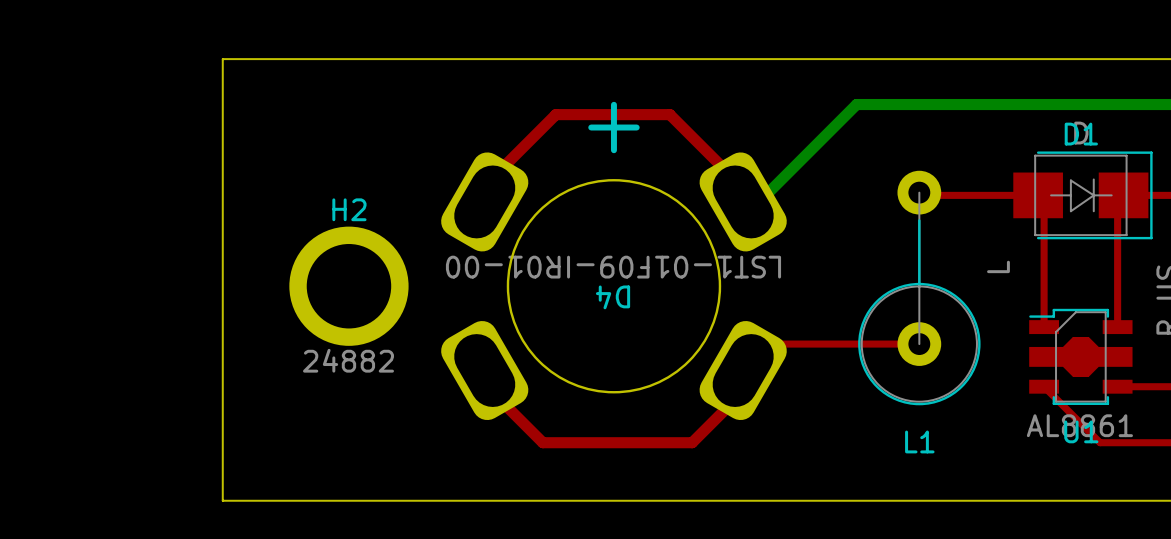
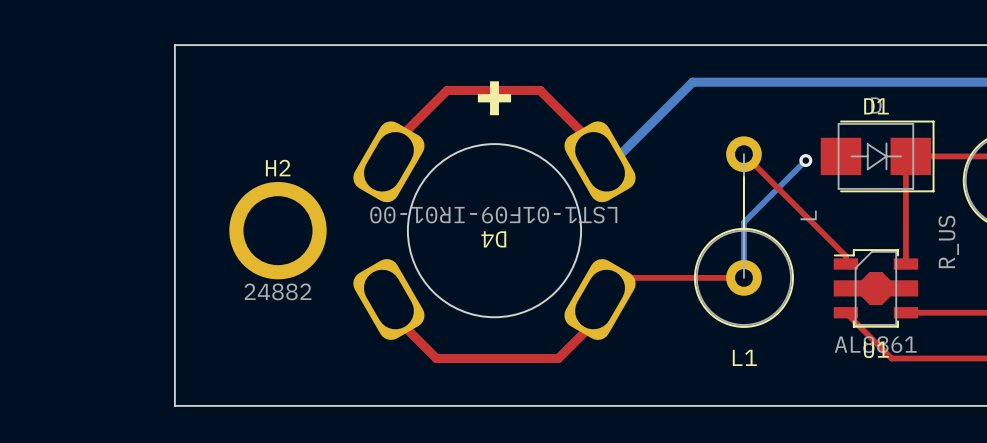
top track: (922, 195) (1038, 195) (1044, 201) (1044, 317) -> (746, 156) (845, 256)
bottom track: none -> (805, 160) (743, 222) (743, 277)
via: none -> (805, 160)

